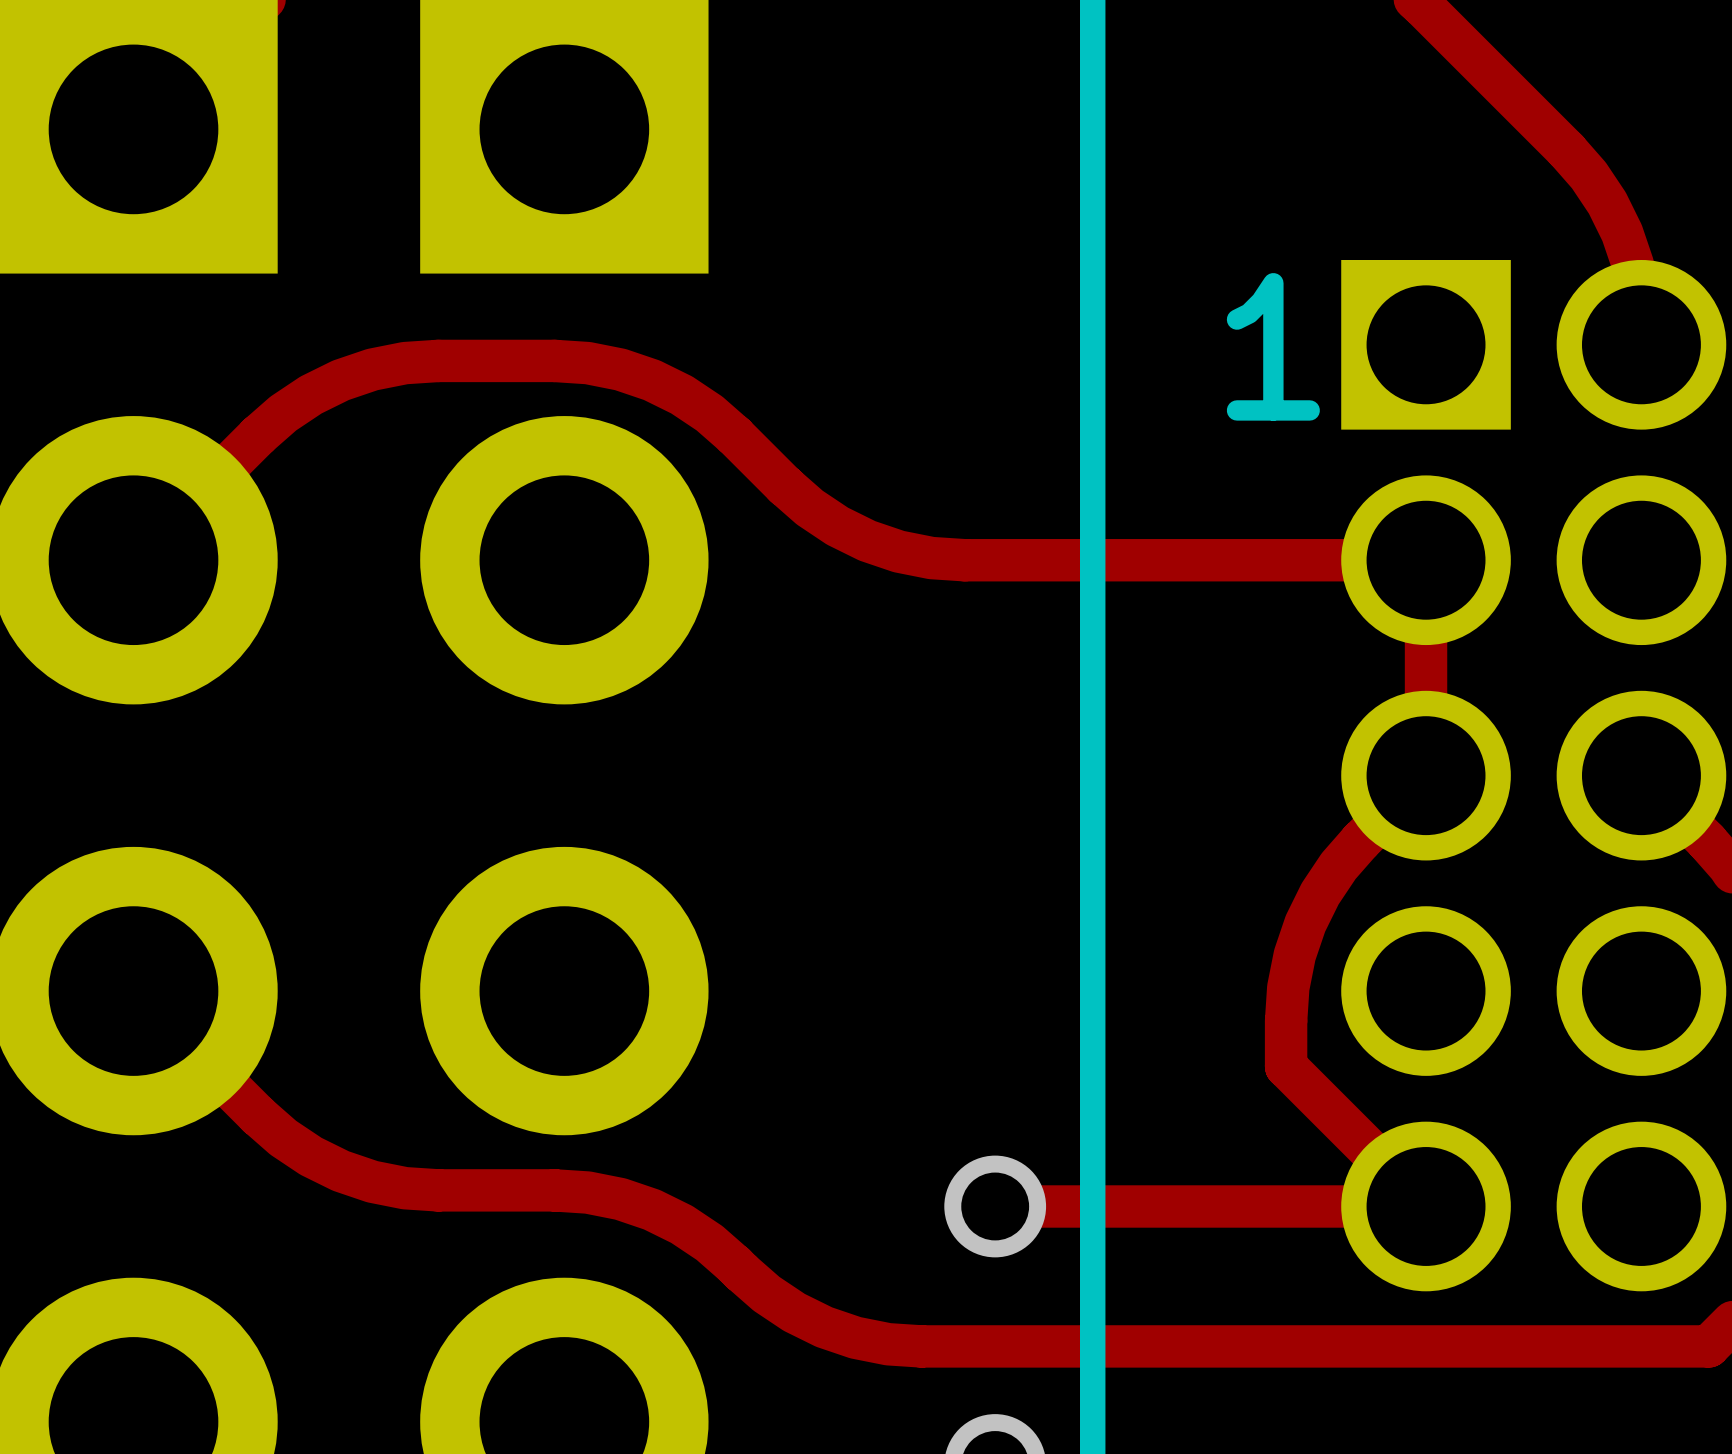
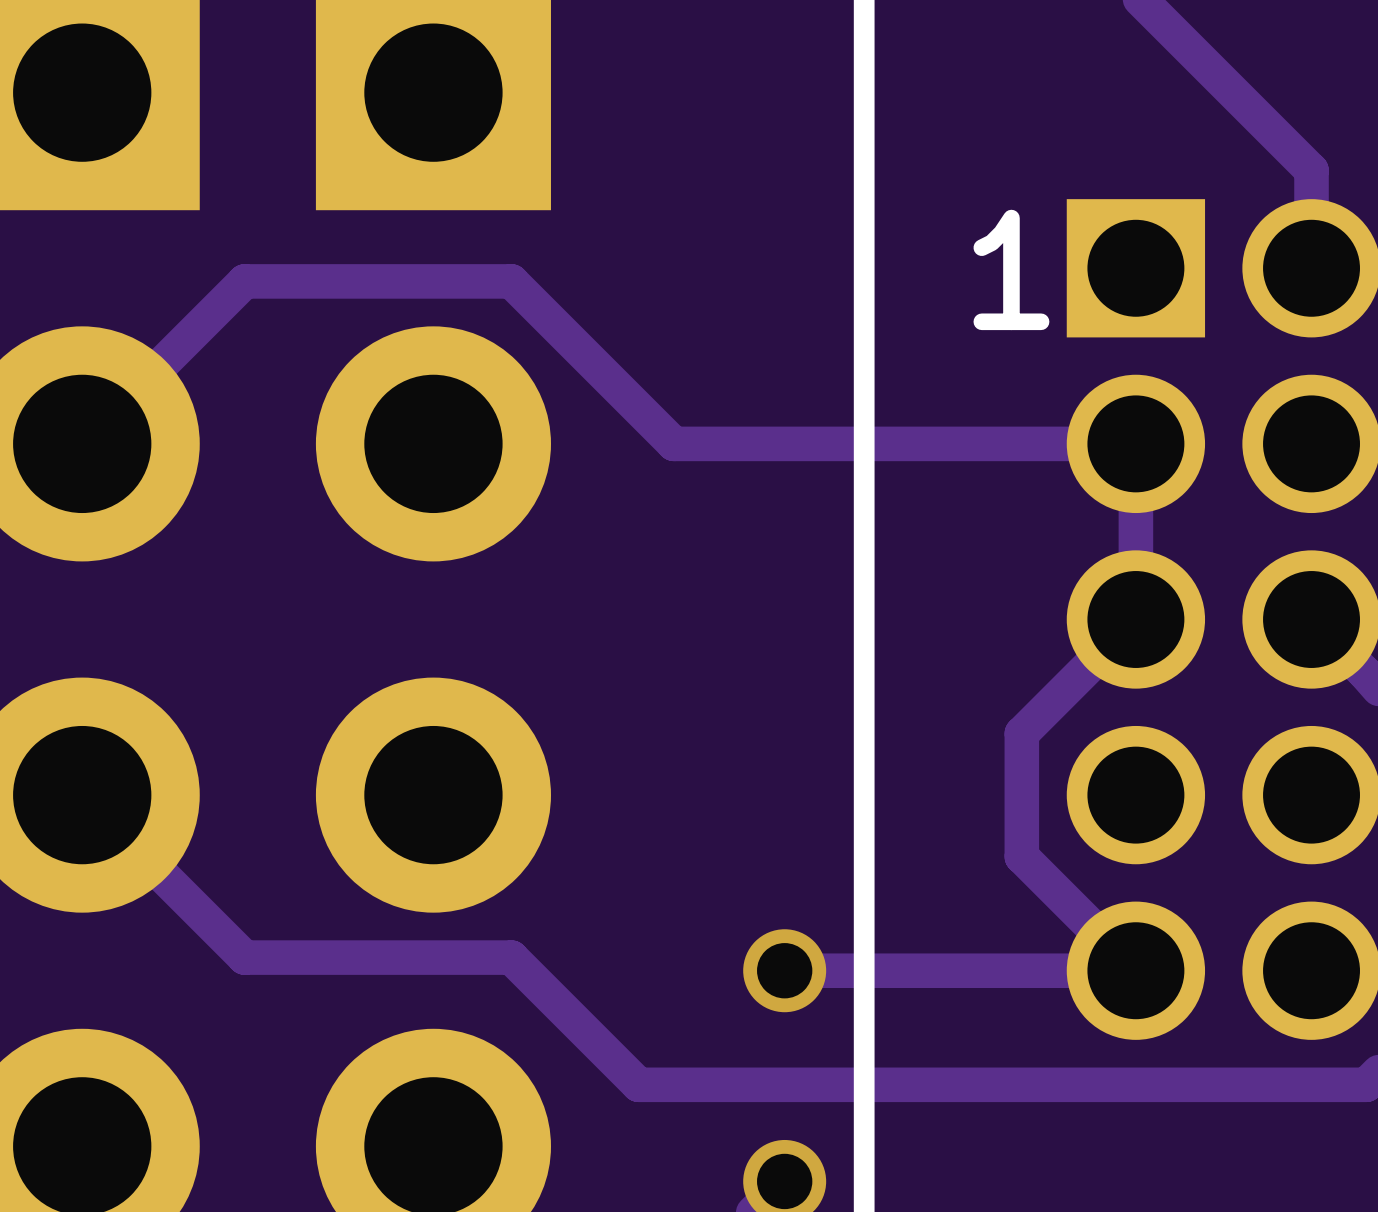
track: (1566, 150) (1588, 175) (1607, 203) (1622, 232) (1632, 264) (1639, 297) (1641, 330) -> (1250, 109) (1311, 170) (1311, 256)
track: (438, 360) (404, 363) (372, 369) (340, 380) (310, 395) (283, 413) (258, 435) -> (330, 281) (244, 281) (183, 342)
track: (554, 360) (587, 363) (620, 369) (651, 380) (681, 395) (709, 413) (734, 435) -> (425, 281) (511, 281) (572, 342)
track: (784, 485) (809, 507) (837, 526) (867, 540) (898, 551) (931, 558) (964, 560) -> (613, 383) (673, 443) (759, 443)
track: (1360, 841) (1338, 866) (1320, 893) (1305, 923) (1294, 955) (1288, 987) (1286, 1020) -> (1082, 672) (1021, 733) (1021, 819)
track: (258, 1115) (283, 1137) (310, 1156) (340, 1171) (372, 1181) (404, 1188) (438, 1190) -> (183, 896) (244, 957) (330, 957)
track: (554, 1190) (587, 1192) (620, 1199) (651, 1209) (681, 1224) (709, 1242) (734, 1264) -> (425, 957) (511, 957) (572, 1018)
track: (741, 1271) (766, 1293) (794, 1312) (824, 1327) (855, 1337) (888, 1344) (921, 1346) -> (577, 1024) (638, 1084) (724, 1084)

